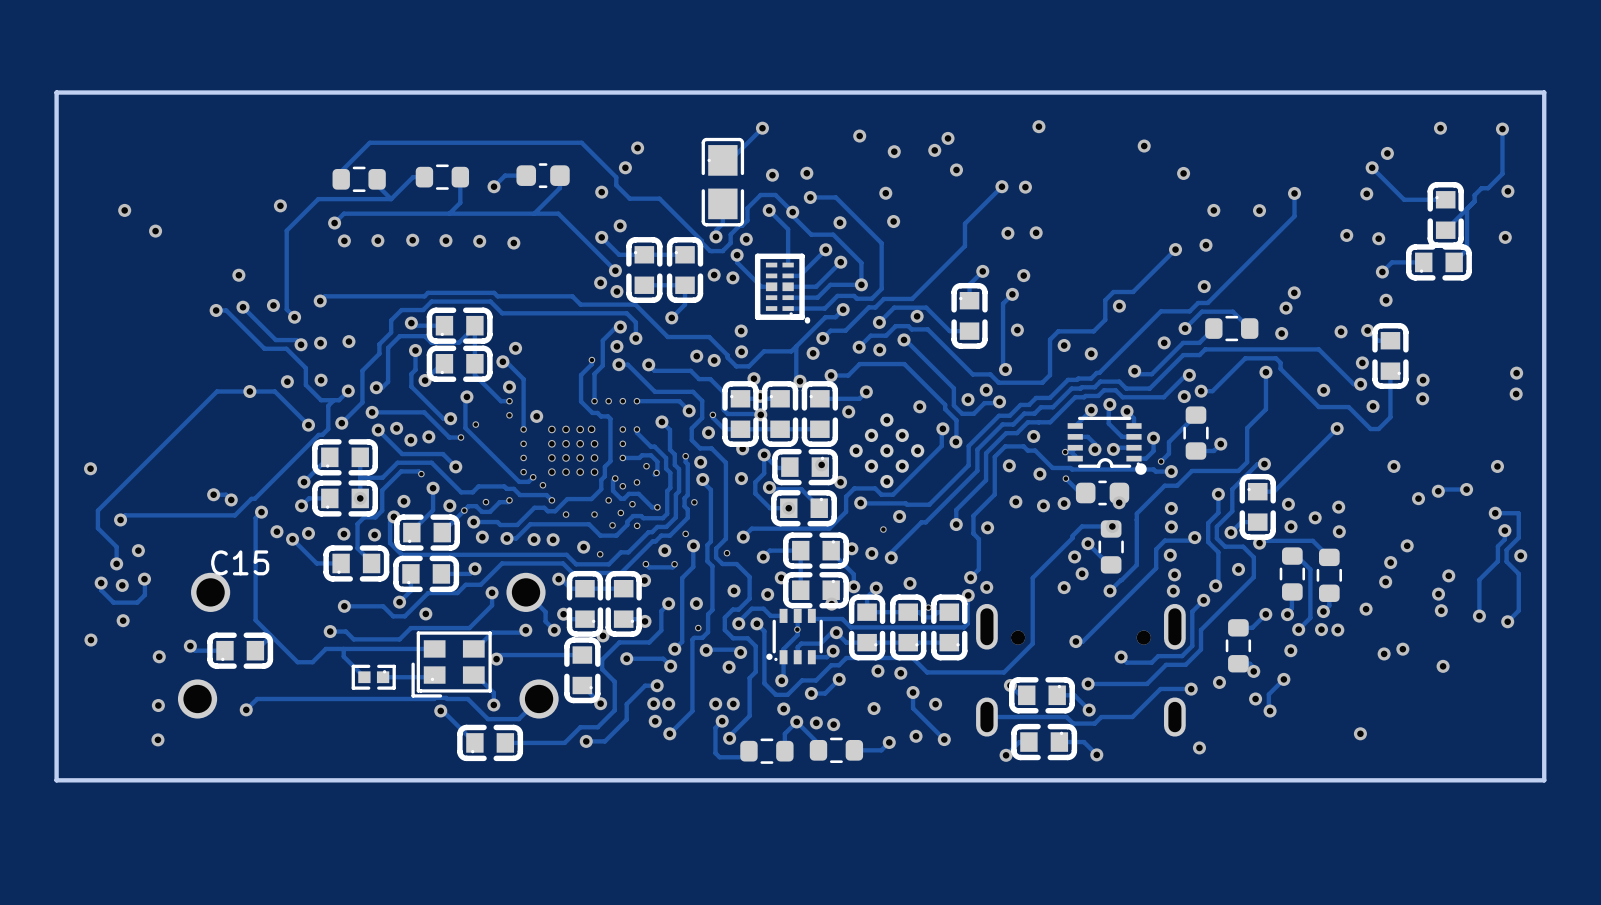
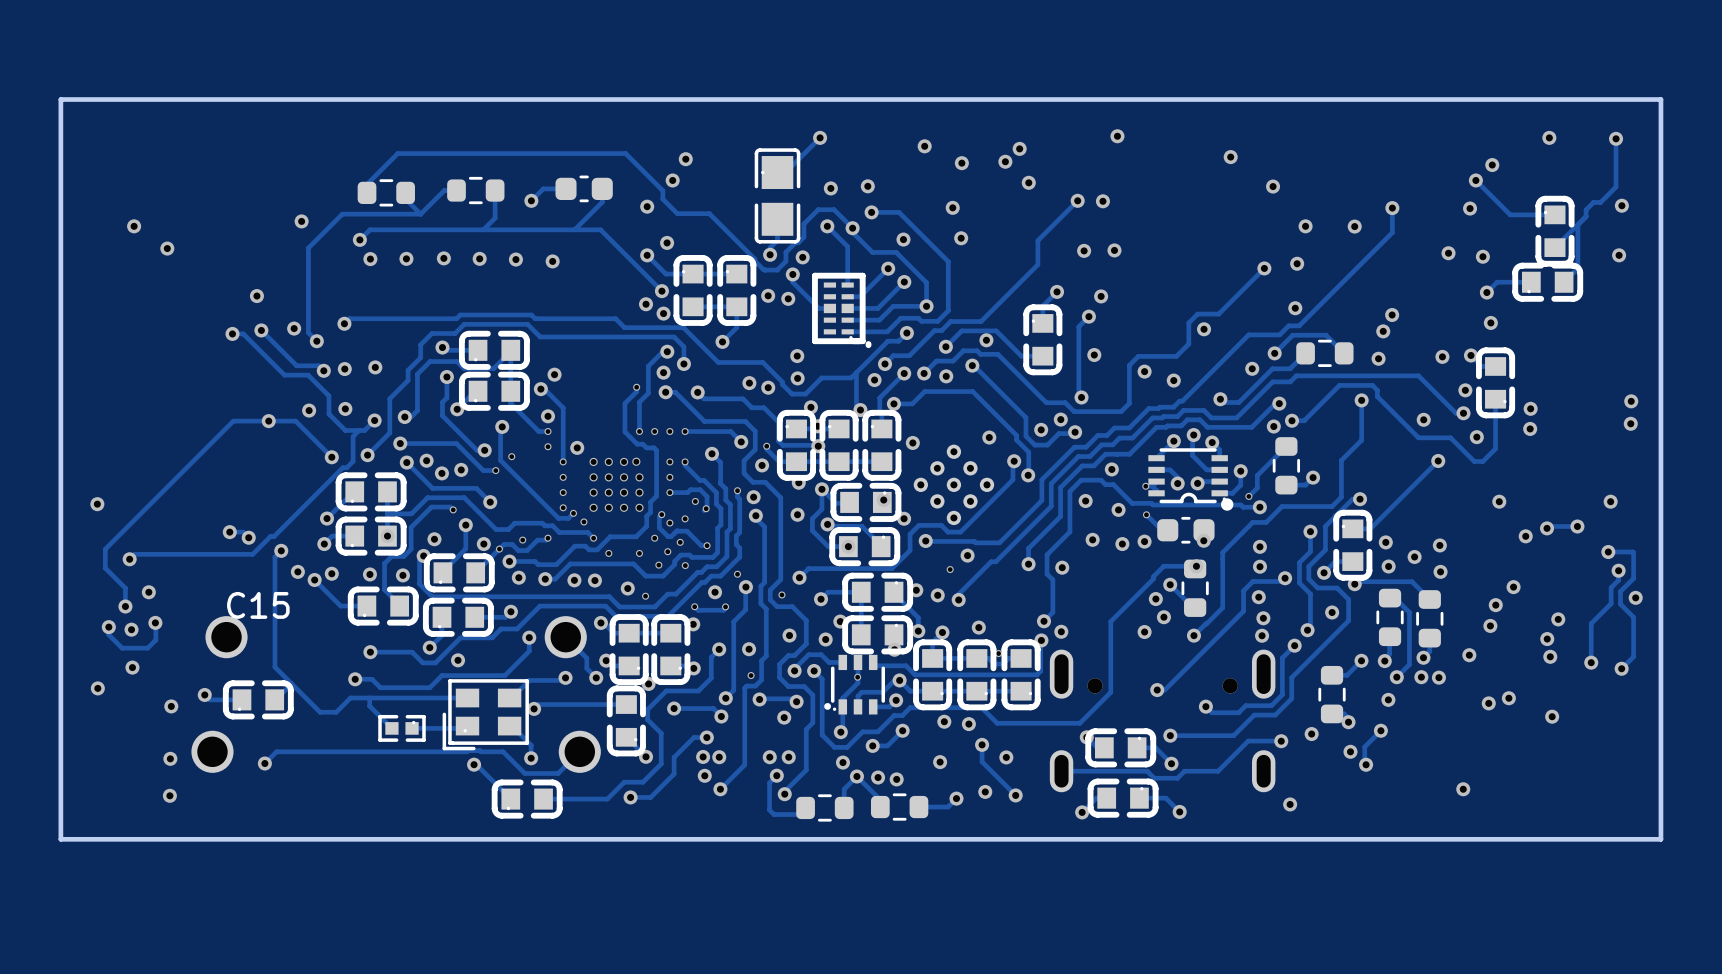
track: (866, 391) (859, 398) (819, 398) -> (904, 373) (879, 397) (881, 428)
via position: (866, 391) -> (904, 373)
via: (694, 502) -> none

